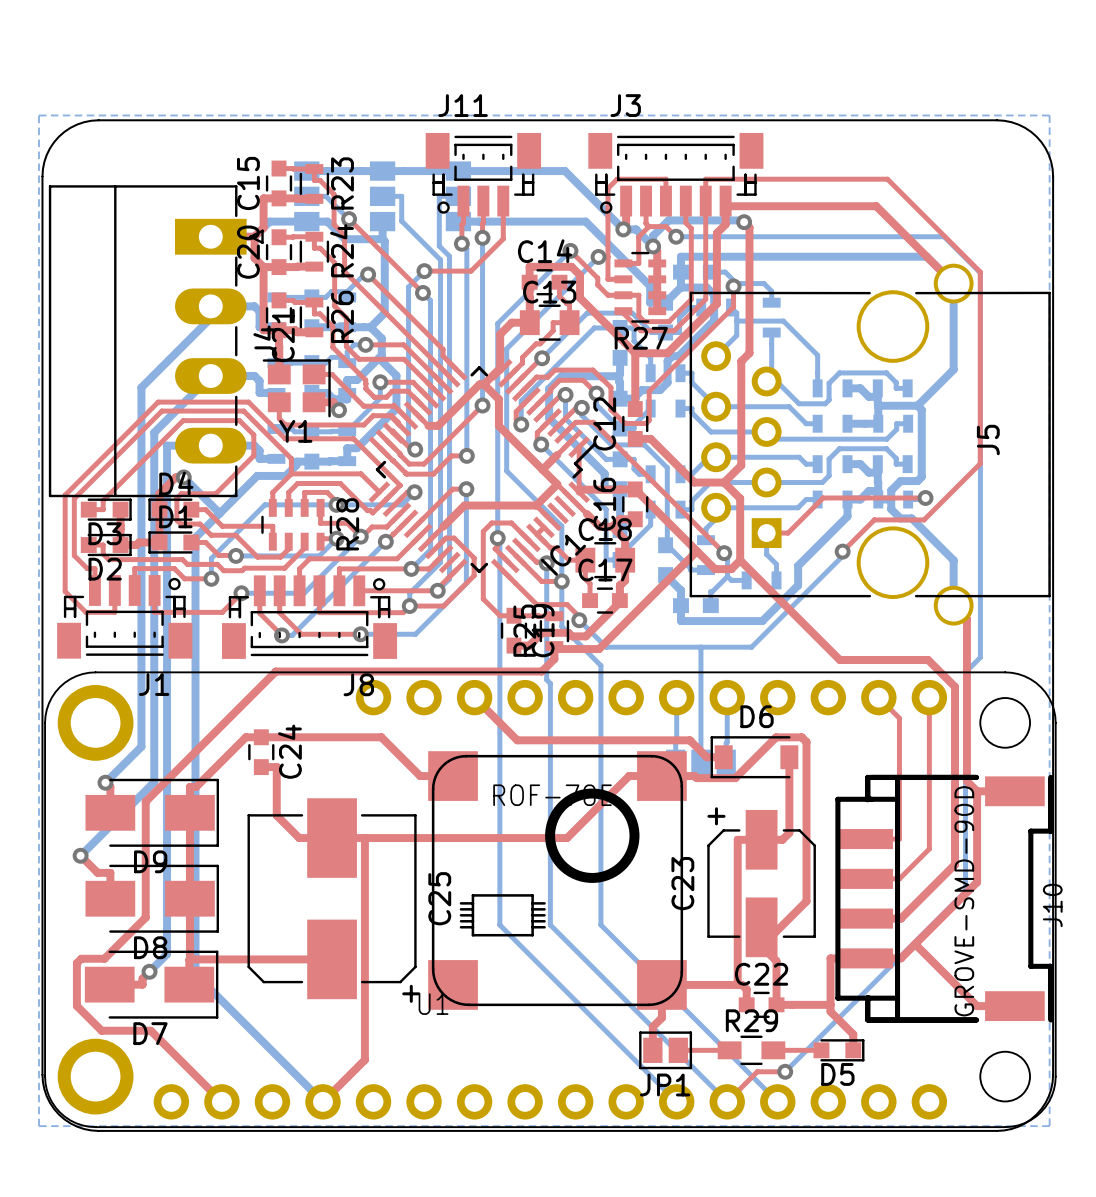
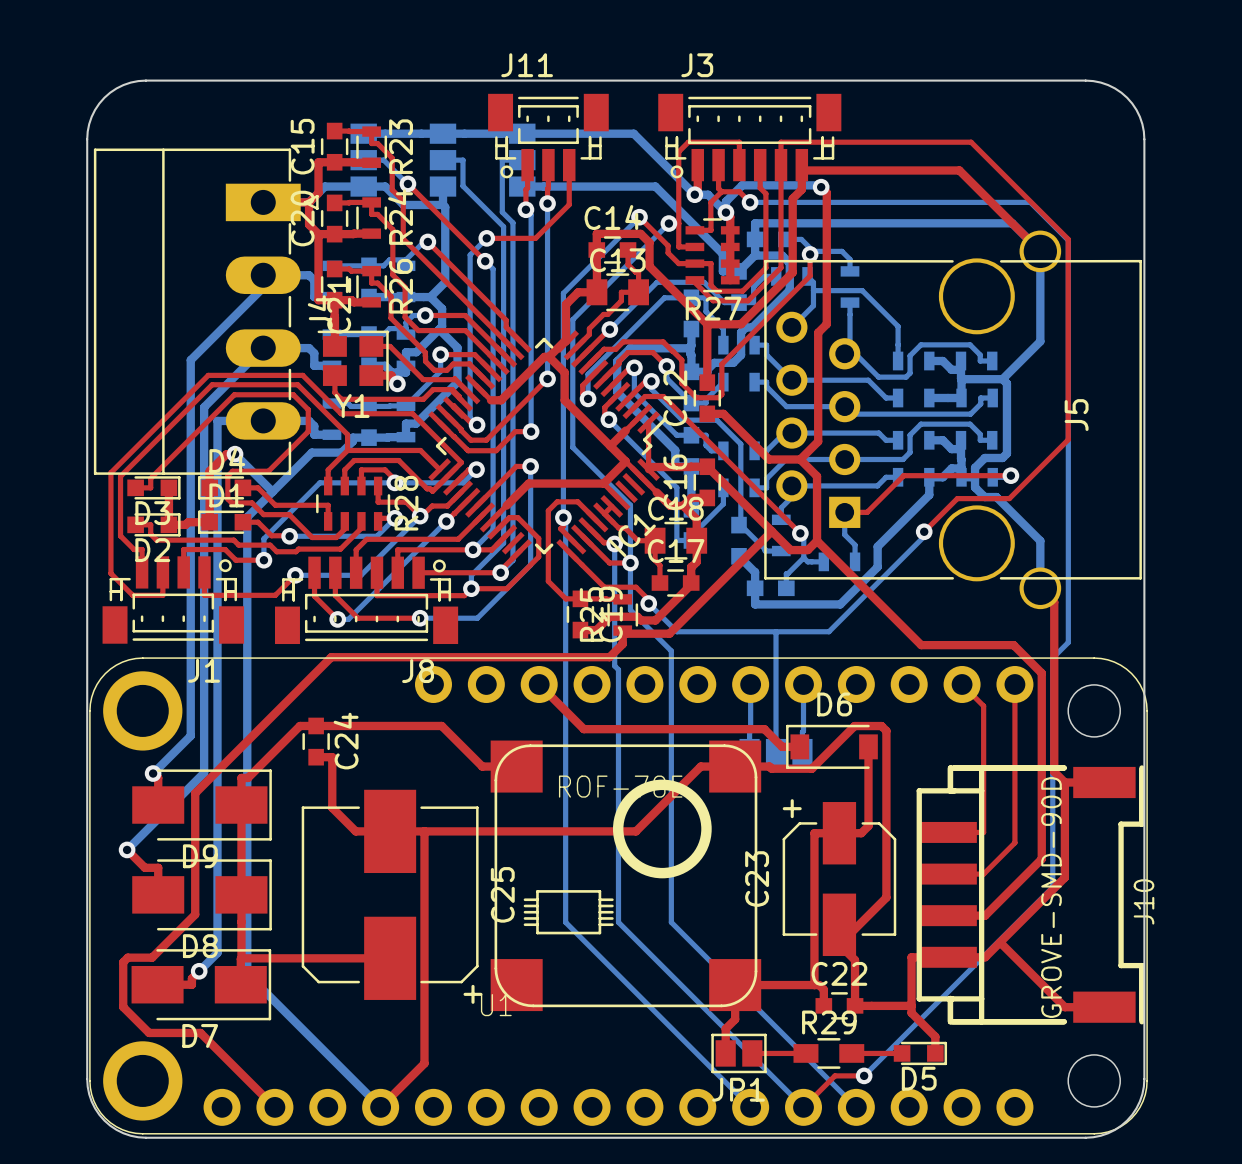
bottom zone outline: (38, 115) (1049, 115) (1049, 1126) (38, 1126) (38, 115) -> none

